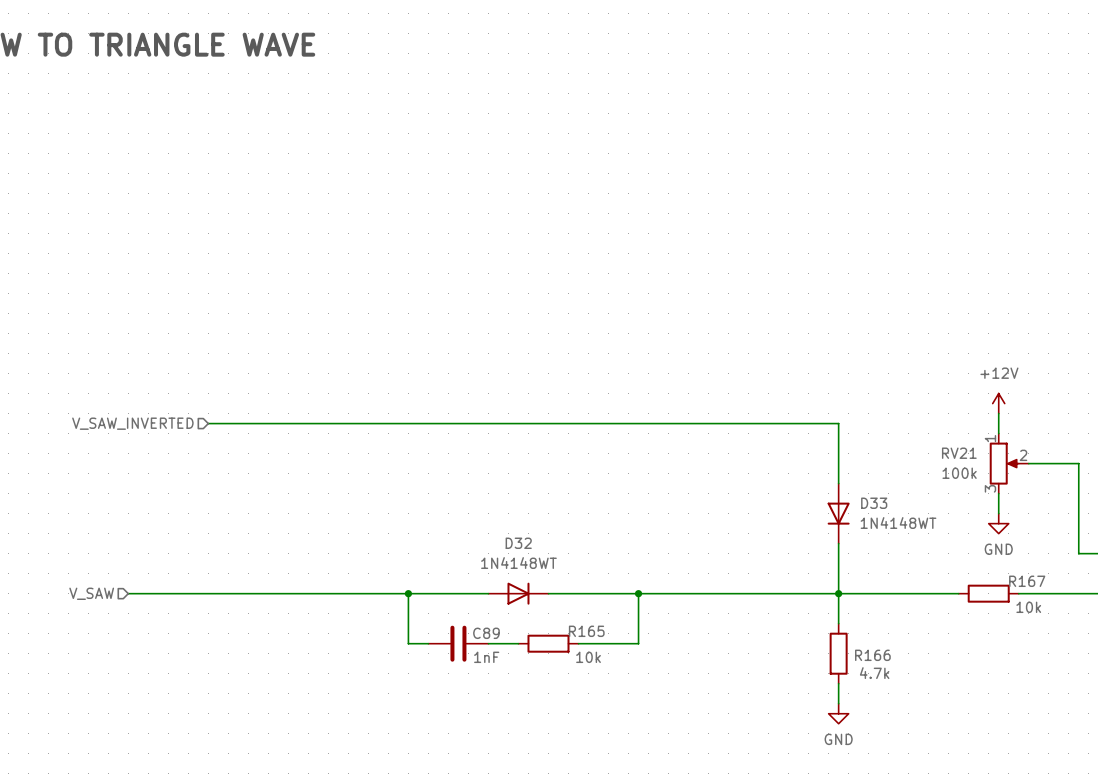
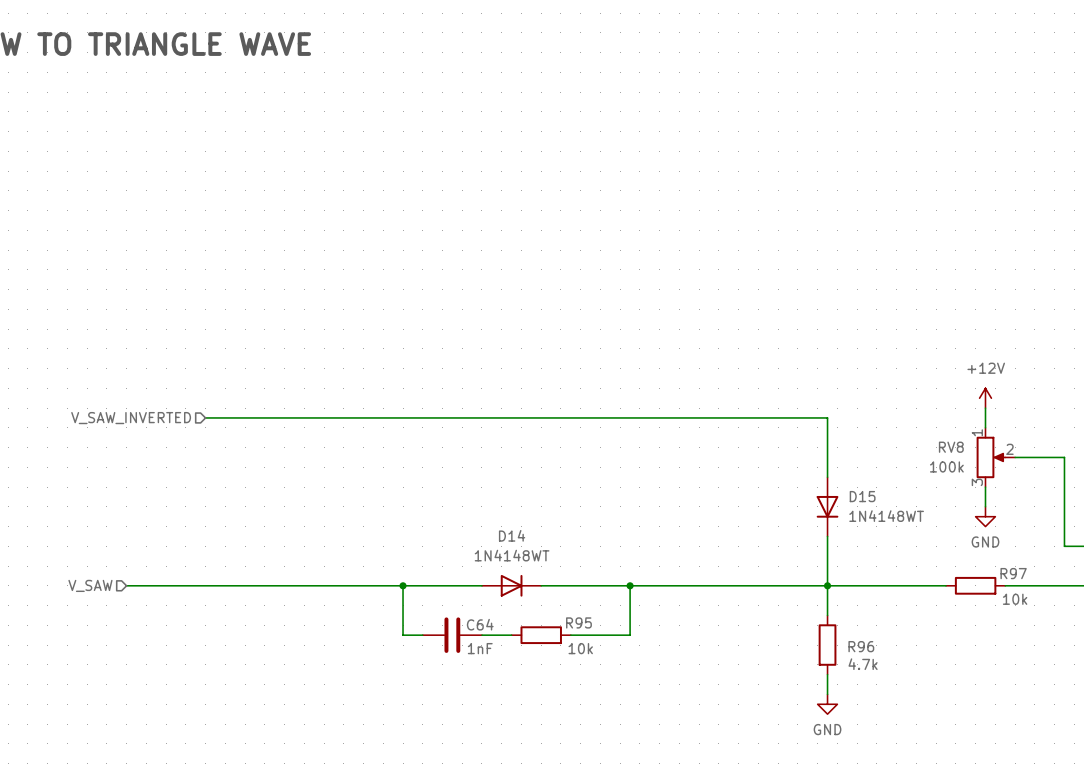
RV21 name: RV21 (959, 453) -> RV8 (951, 447)
D33 name: D33 (874, 503) -> D15 (862, 496)
D32 name: D32 (518, 543) -> D14 (512, 535)
R167 name: R167 (1027, 581) -> R97 (1013, 573)
R165 name: R165 (586, 631) -> R95 (578, 622)
C89 name: C89 (486, 633) -> C64 (480, 624)
R166 name: R166 (872, 655) -> R96 (861, 646)

